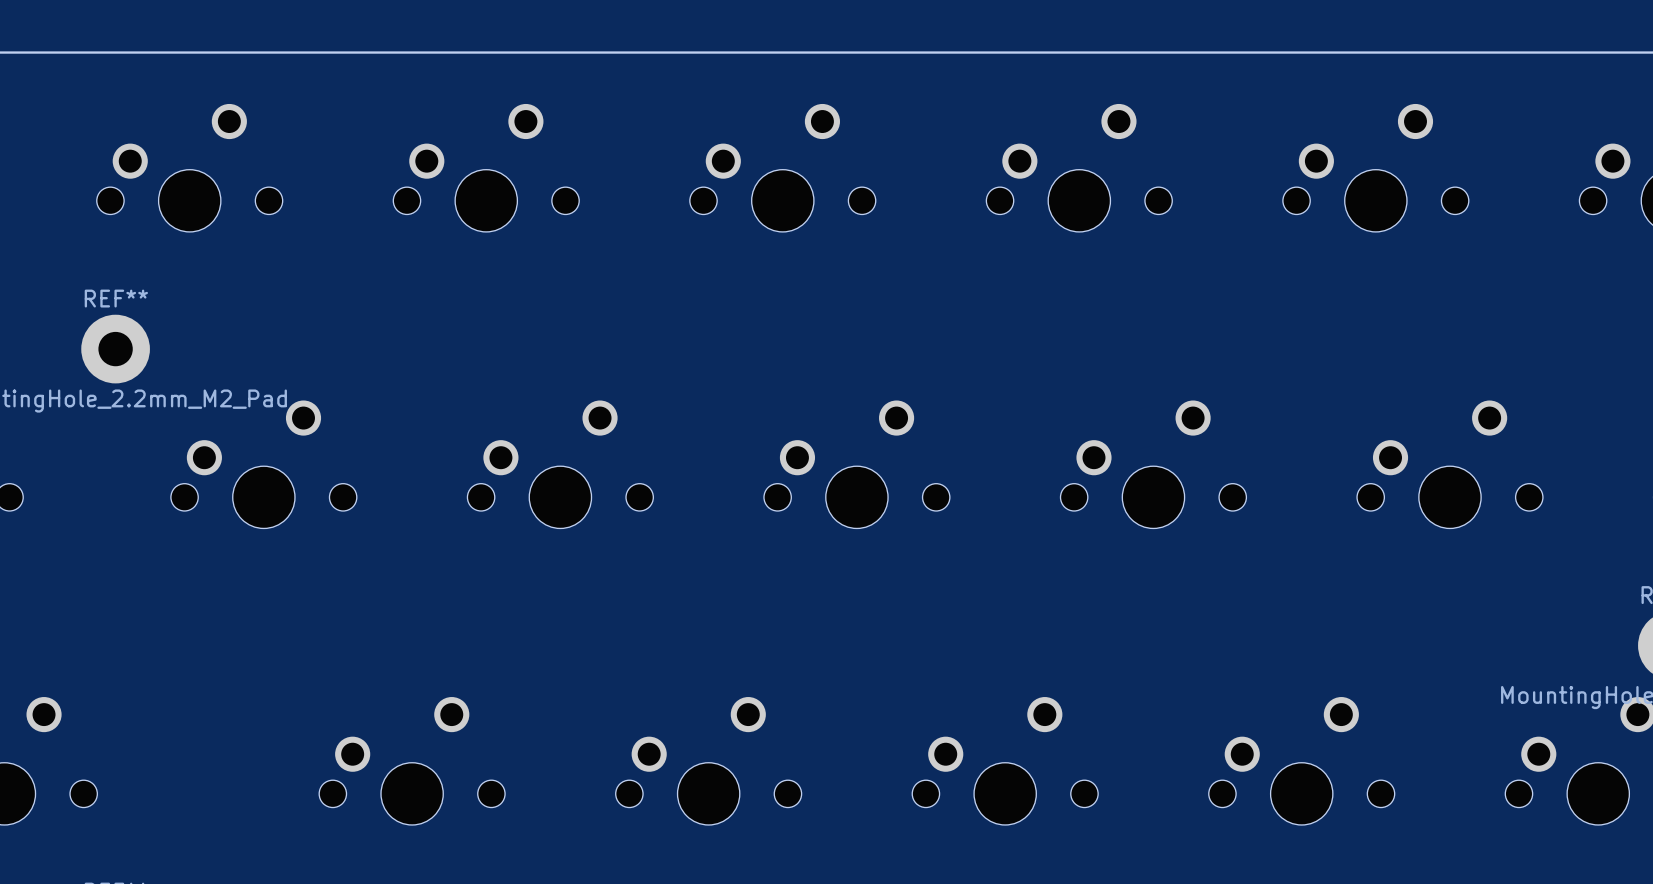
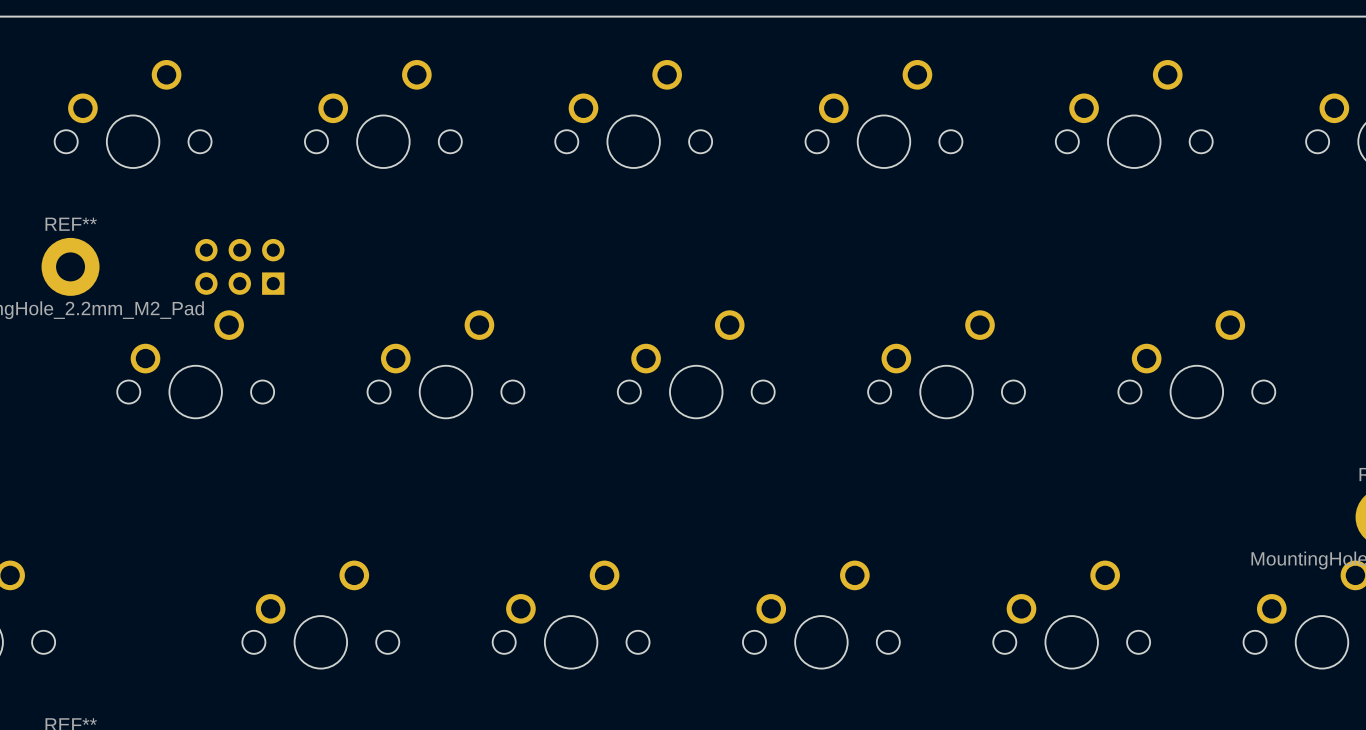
part: none -> (239, 266)

